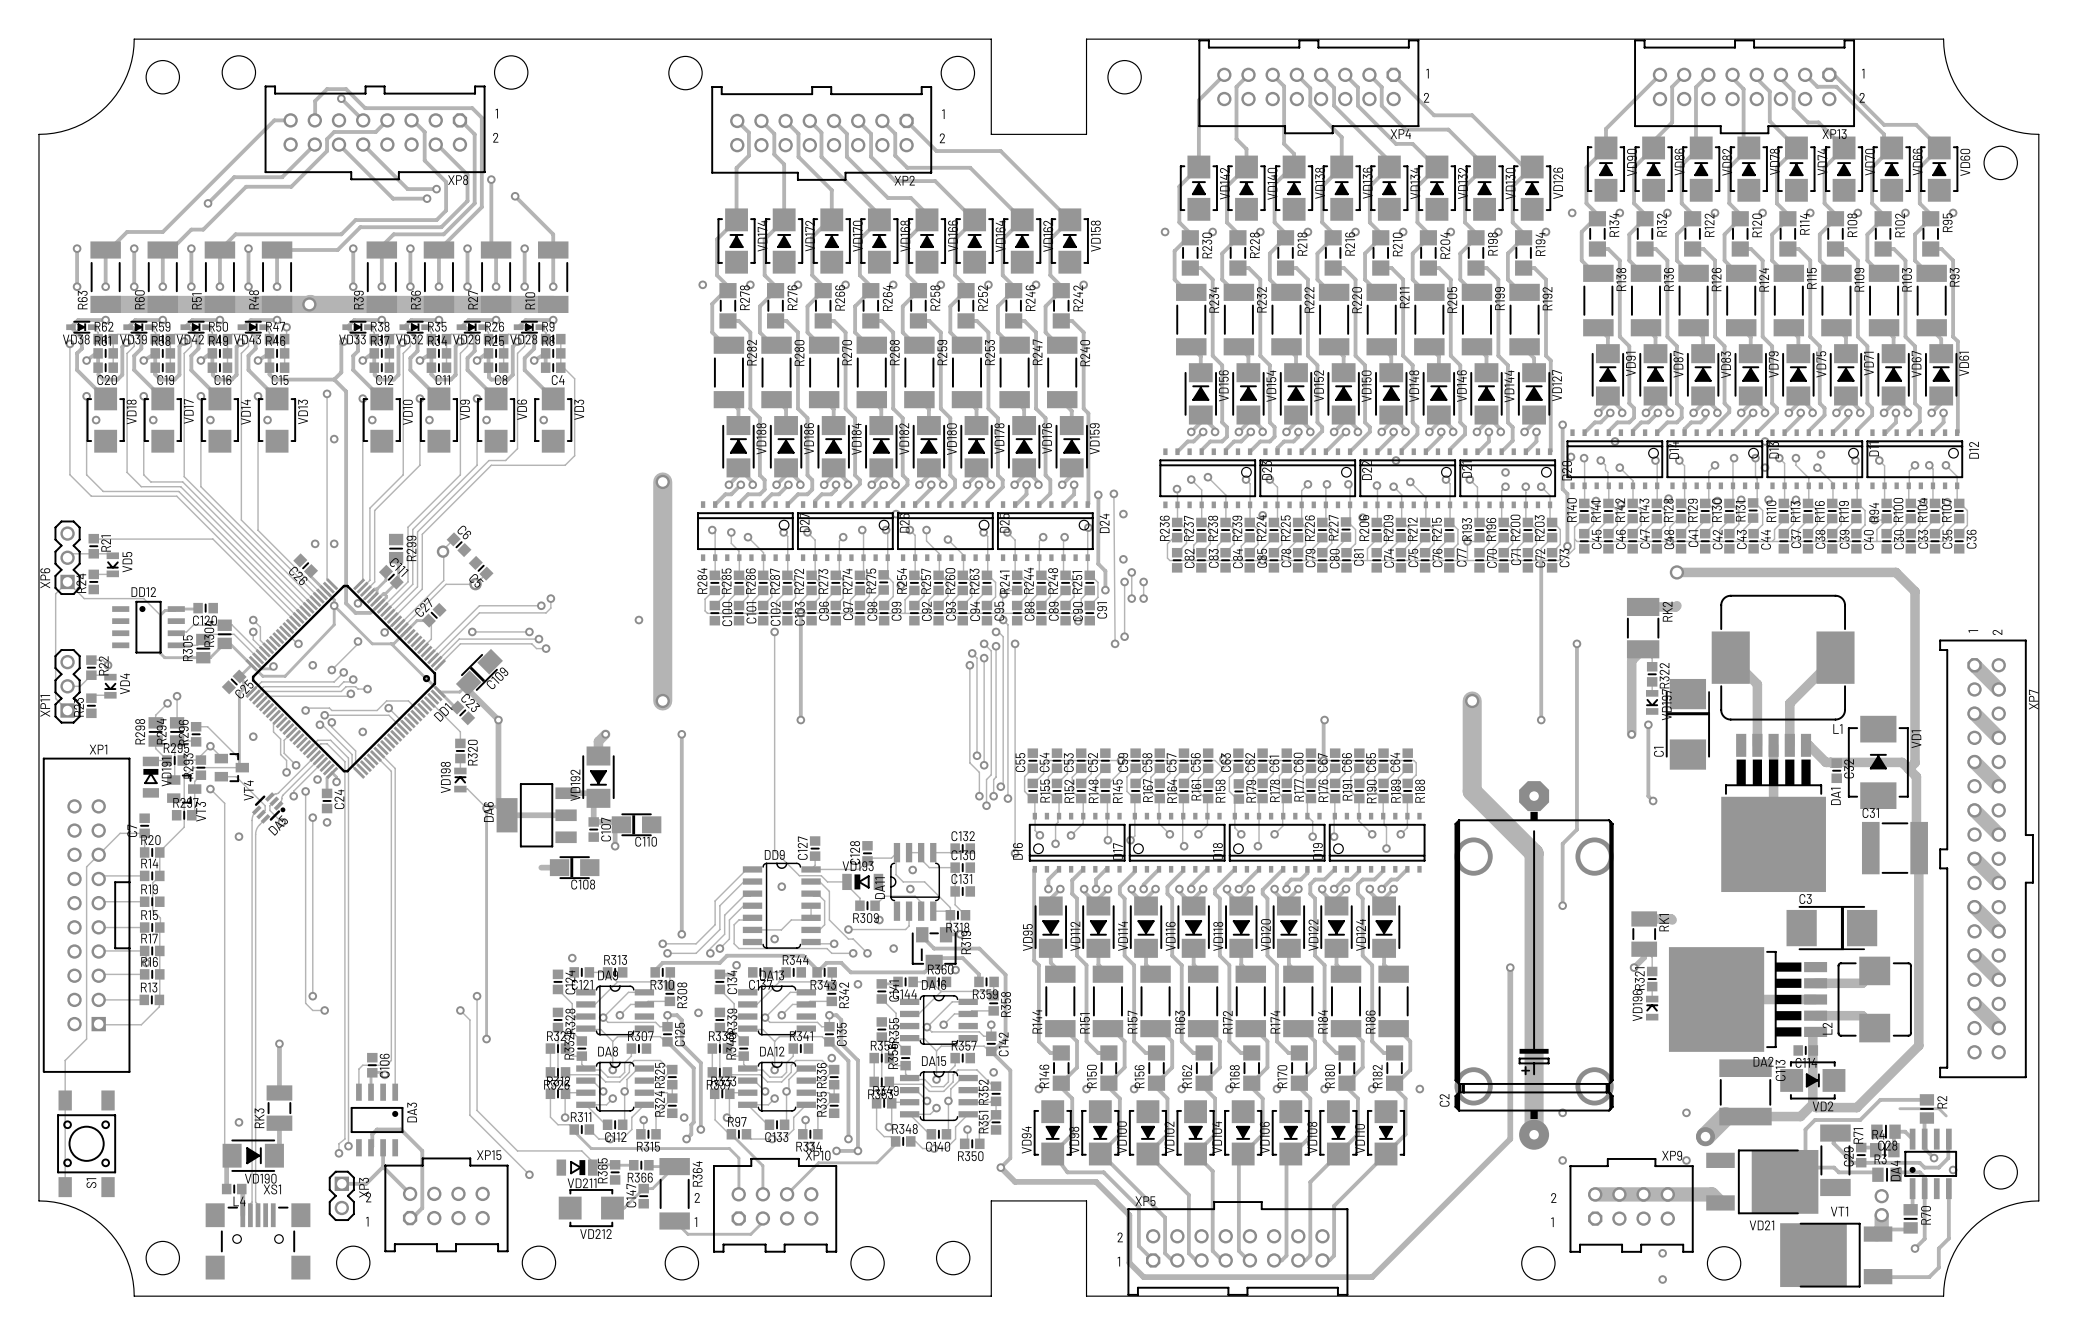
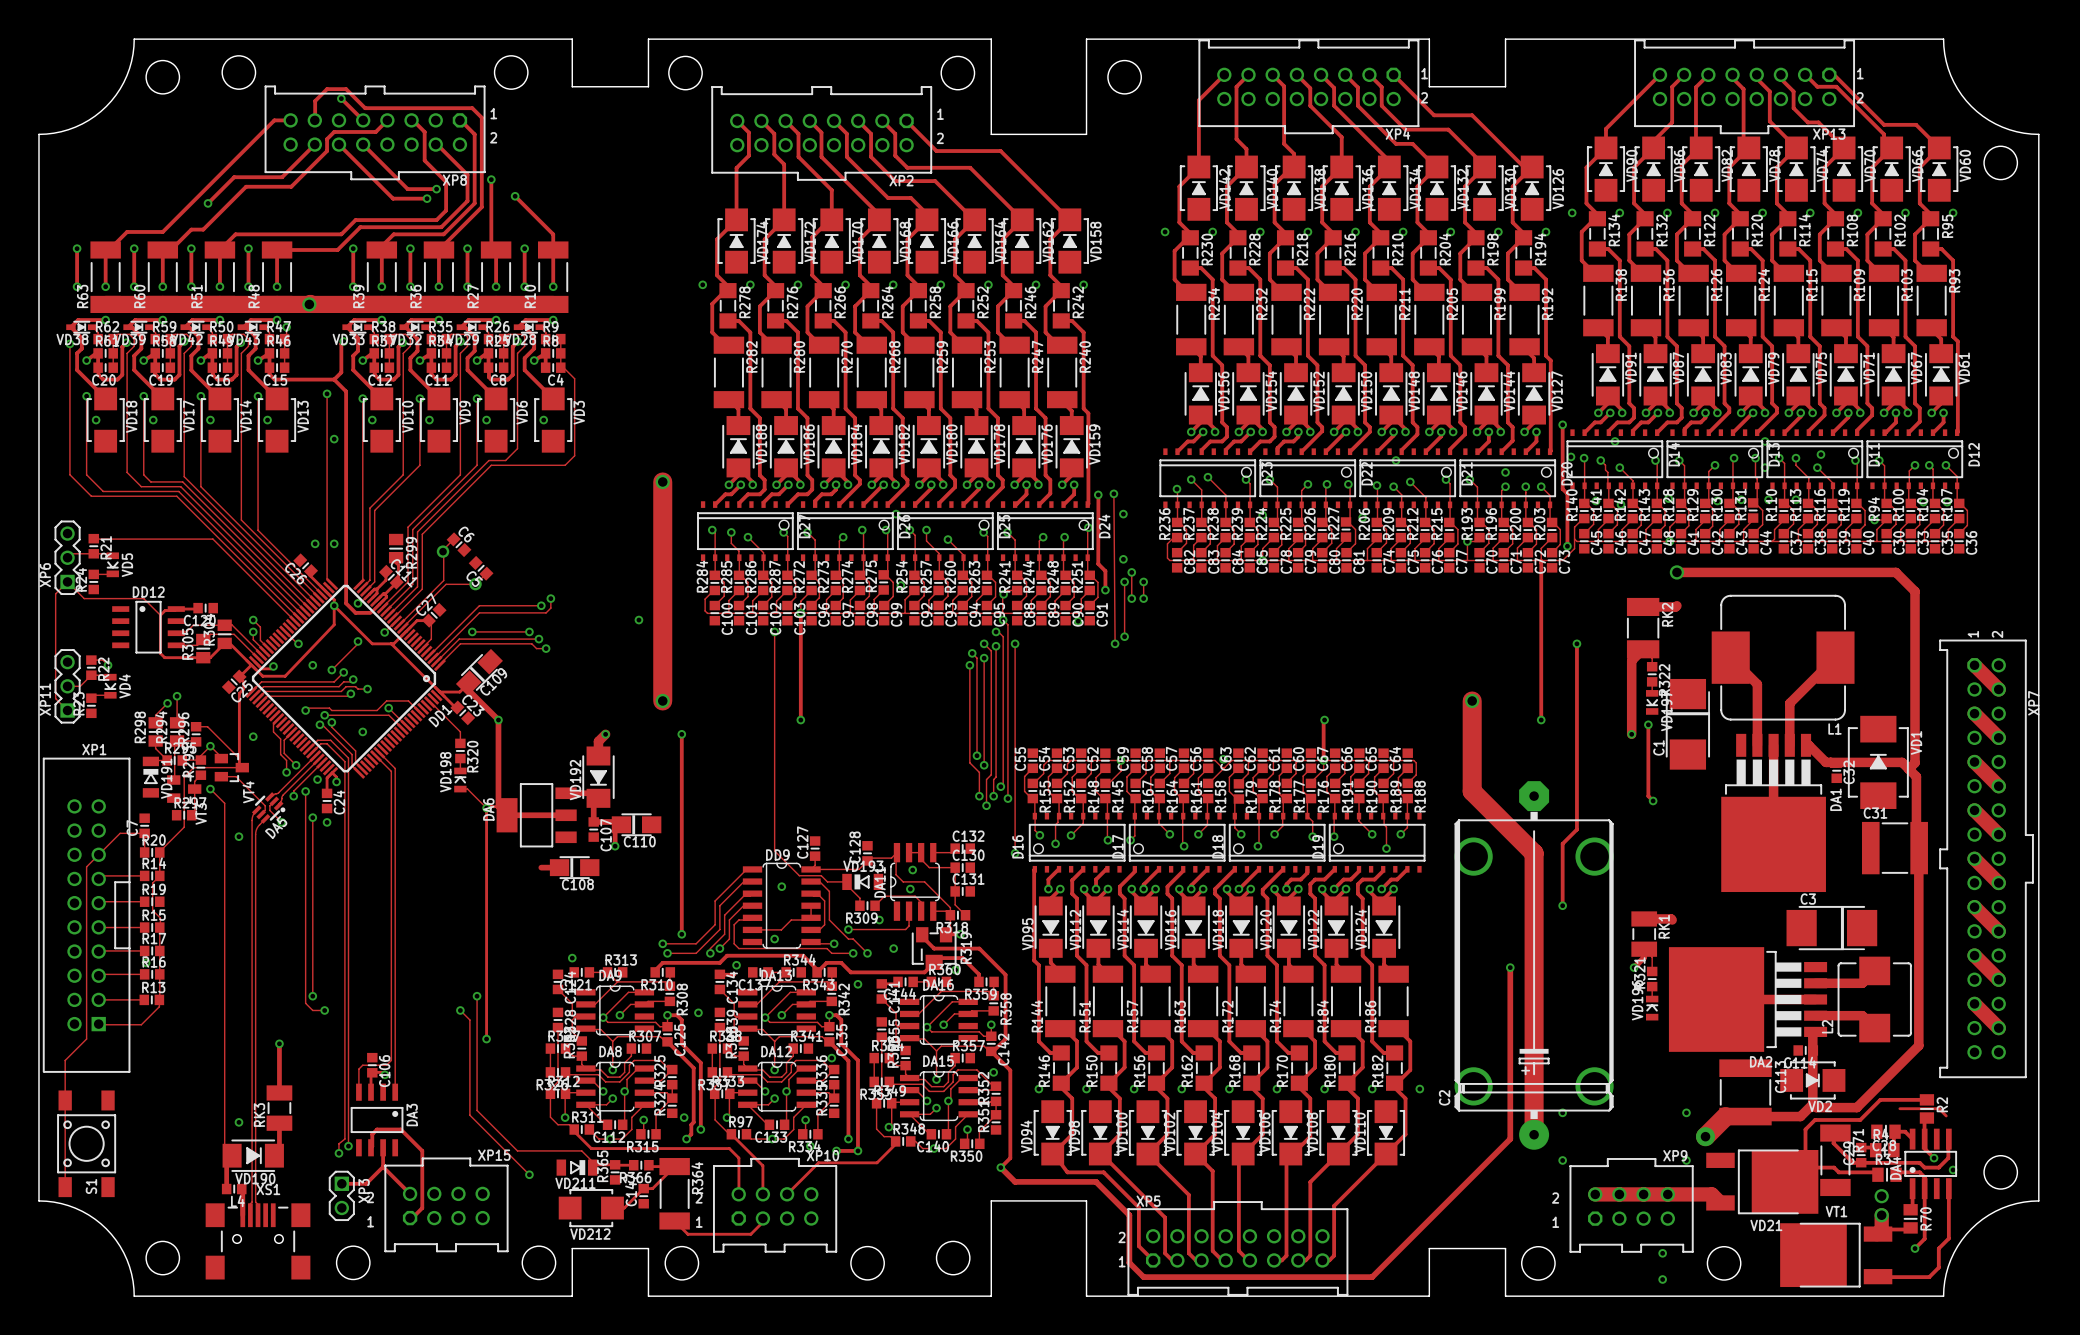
board edge: (572, 39) (648, 39) -> (572, 39) (572, 86) (648, 86) (648, 39)
board edge: (1429, 39) (1505, 39) -> (1429, 39) (1429, 86) (1505, 86) (1505, 39)
board edge: (572, 1296) (648, 1296) -> (572, 1296) (572, 1248) (648, 1248) (648, 1296)
board edge: (1429, 1296) (1505, 1296) -> (1429, 1296) (1429, 1248) (1505, 1248) (1505, 1296)

